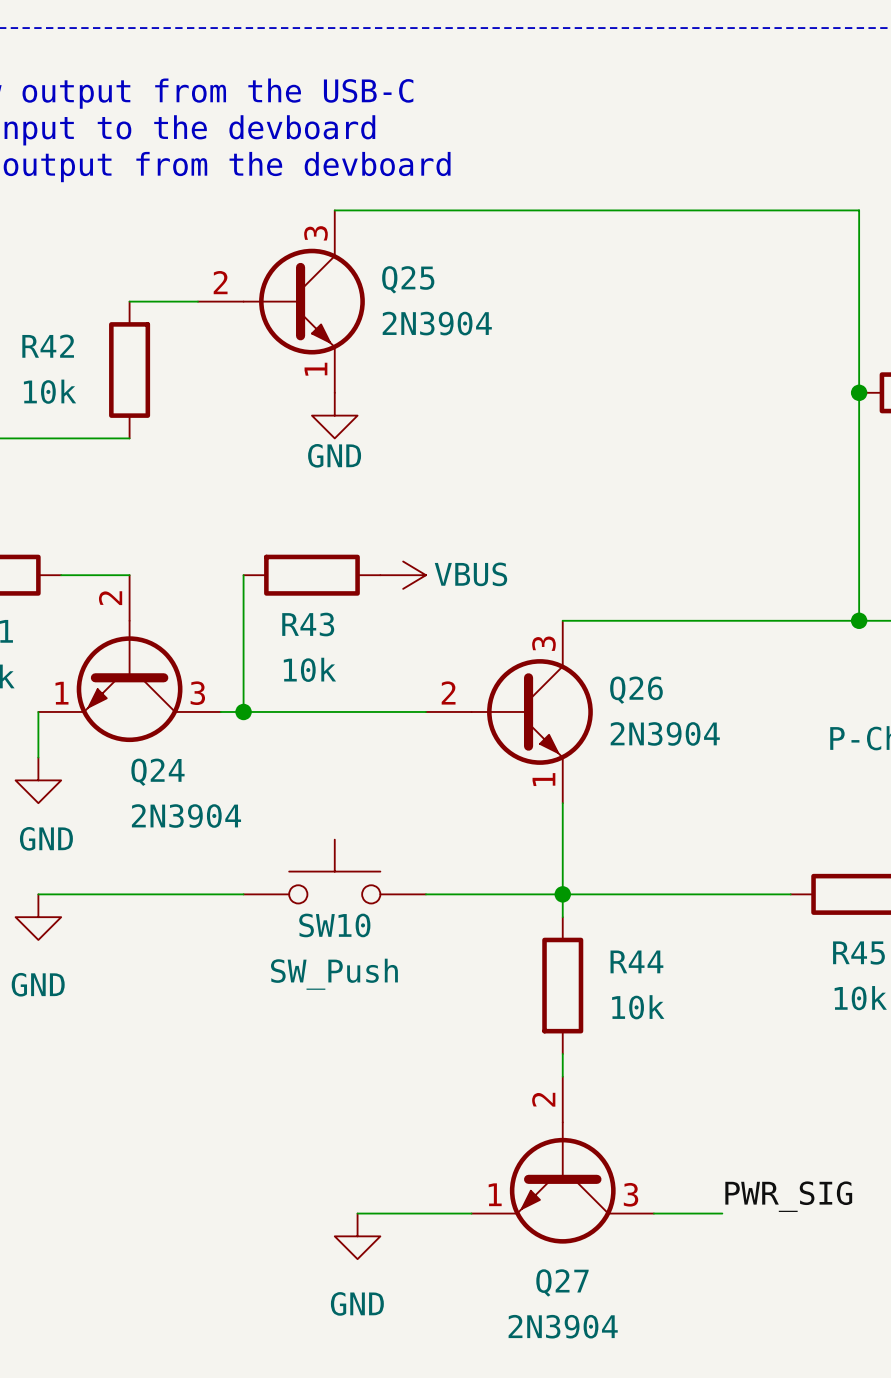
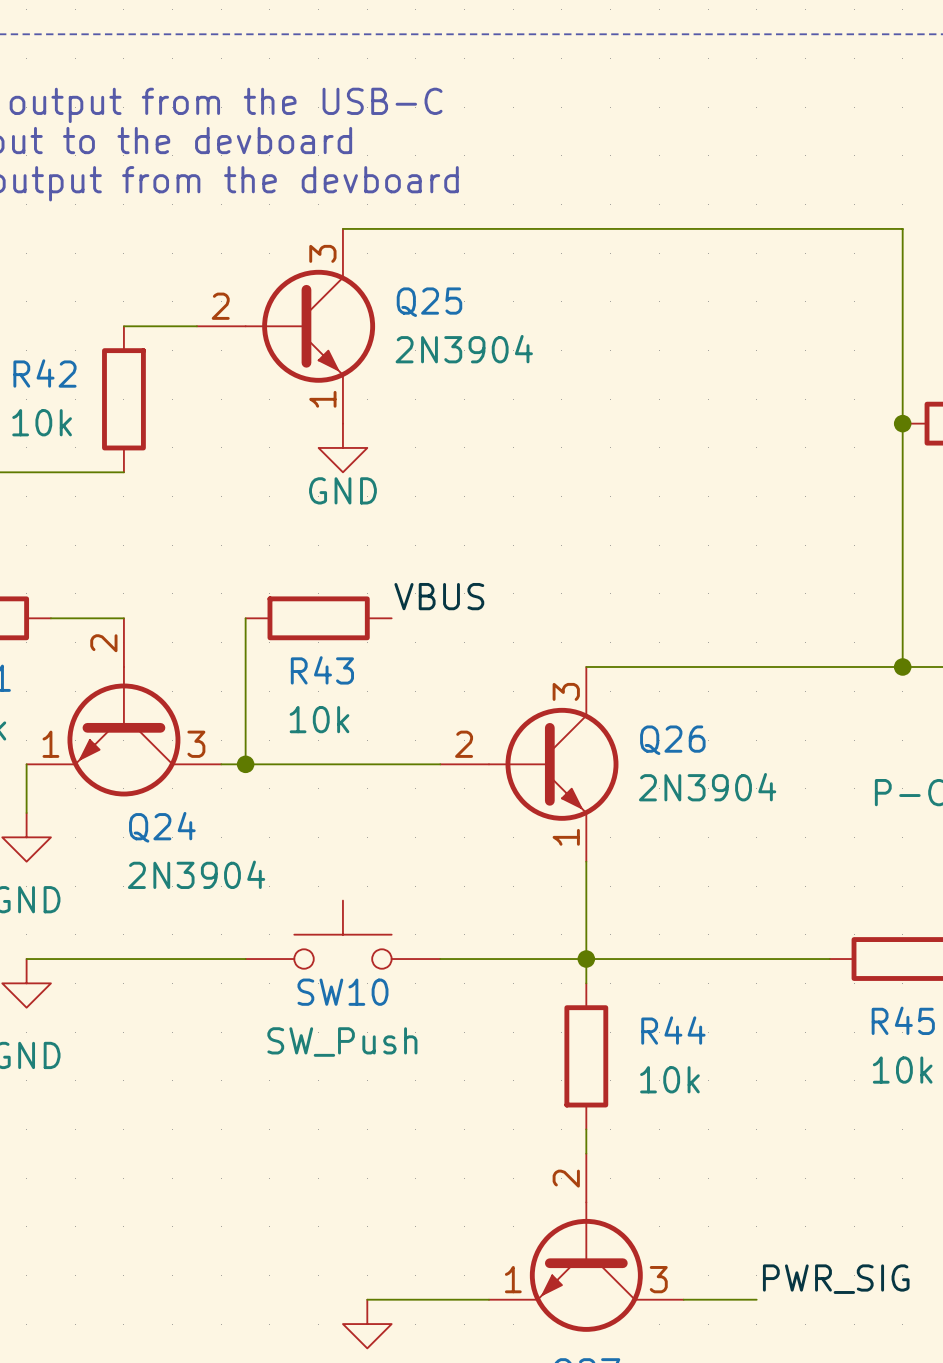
label: none -> VBUS (439, 596)
power symbol: VBUS (403, 575) -> none

